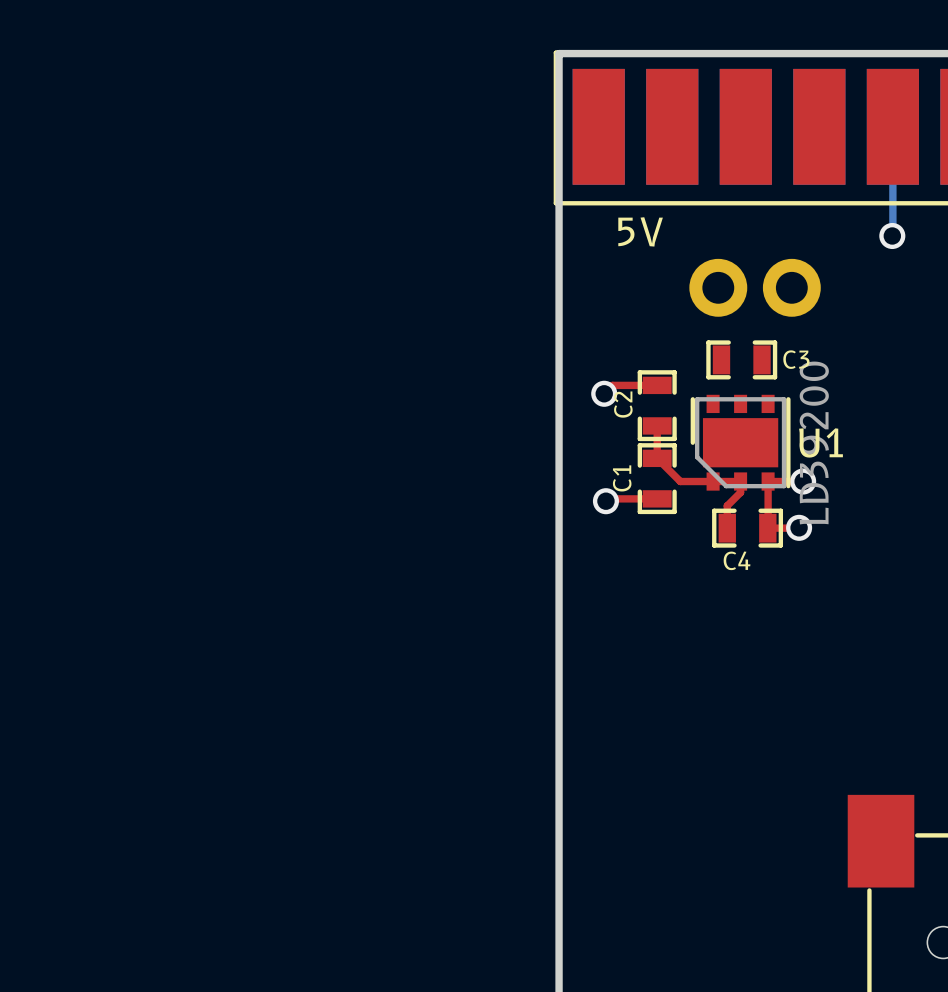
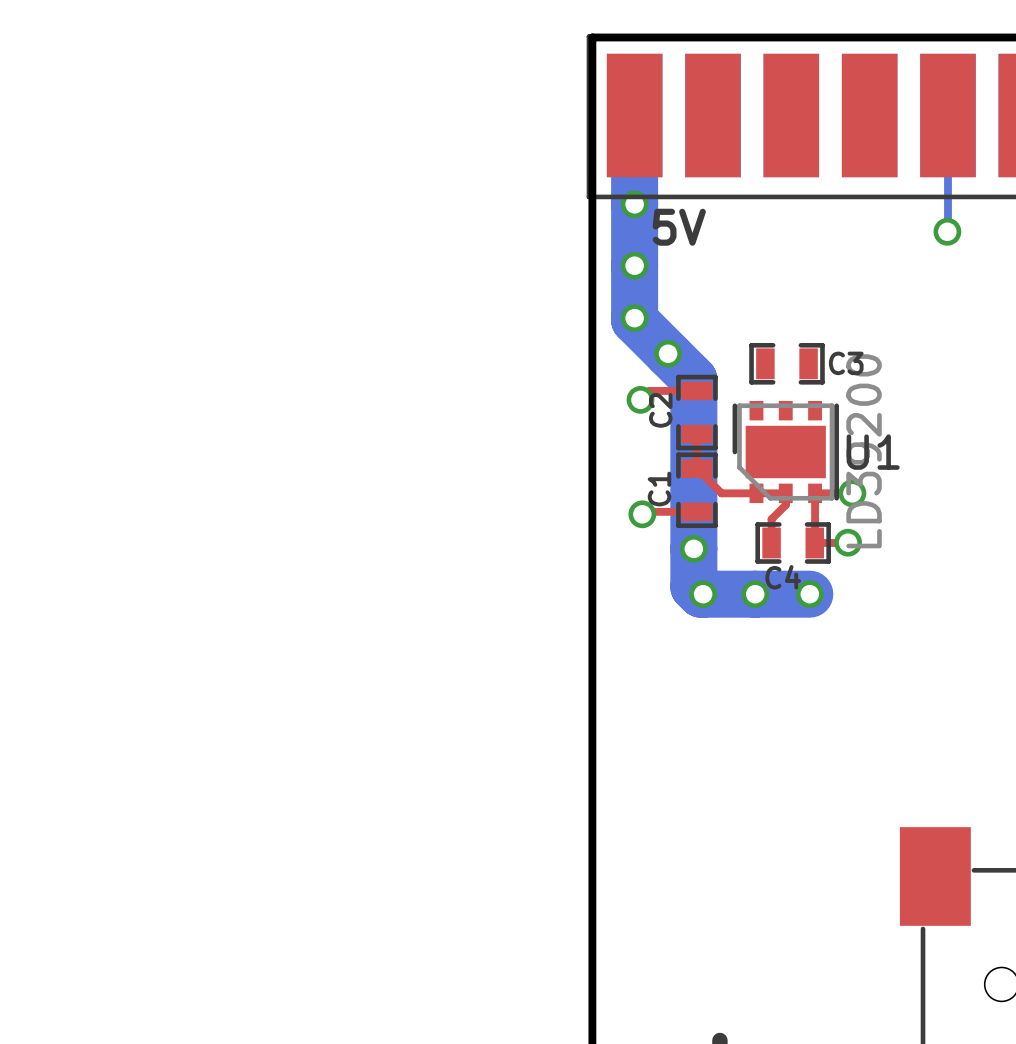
bottom track: none -> (634, 115) (634, 320) (693, 379) (693, 587) (700, 594) (809, 594)
via: none -> (634, 204)
via: none -> (634, 265)
part: (755, 287) -> none
via: none -> (634, 318)
via: none -> (668, 353)
via: none -> (693, 548)
via: none -> (703, 594)
via: none -> (755, 594)
via: none -> (809, 594)

